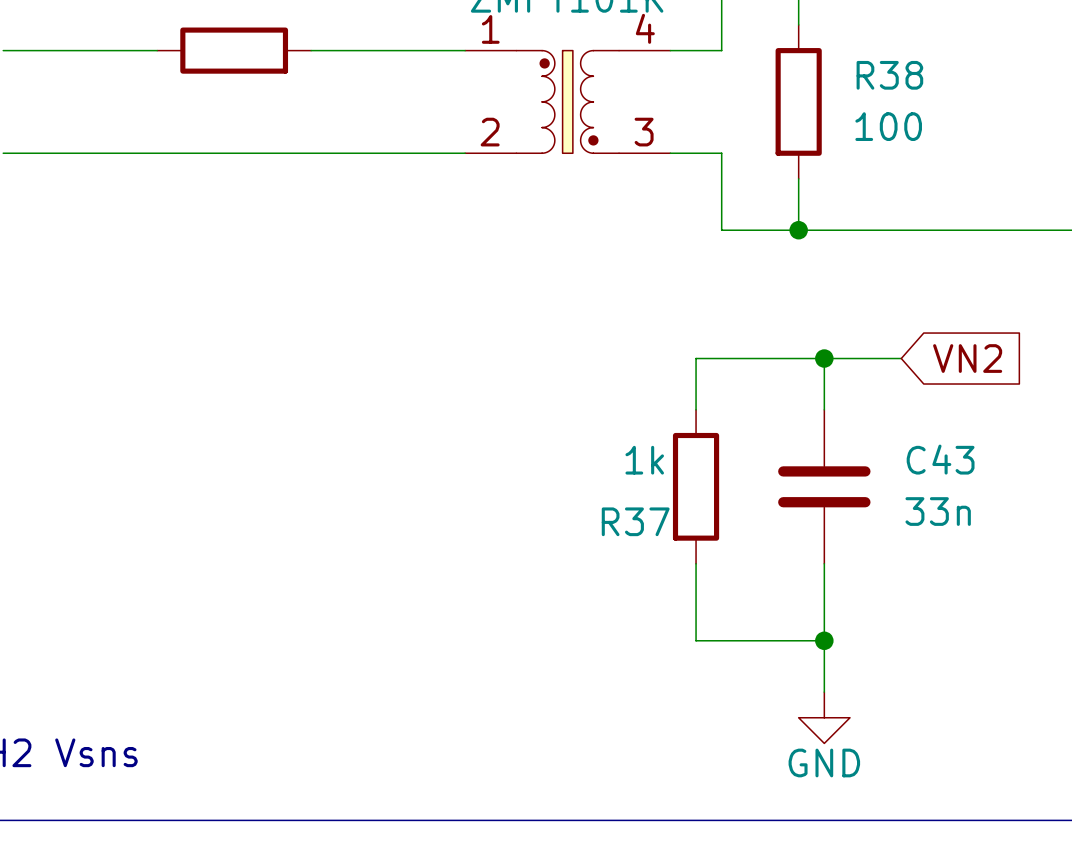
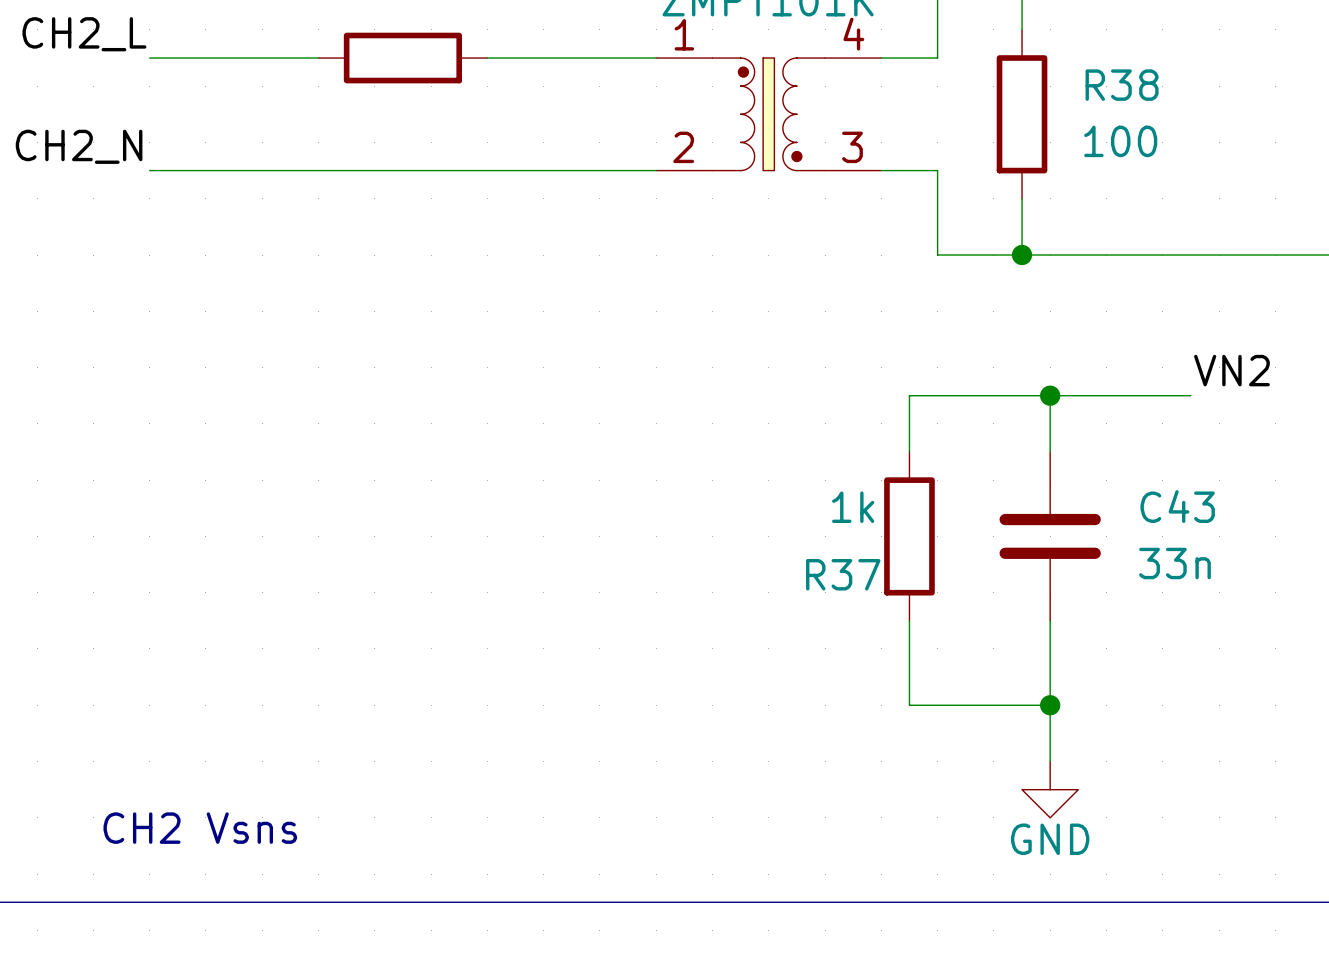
label: none -> VN2 (1231, 370)
wire: none -> (1134, 395) (1190, 395)
global label: VN2 (967, 358) -> none

